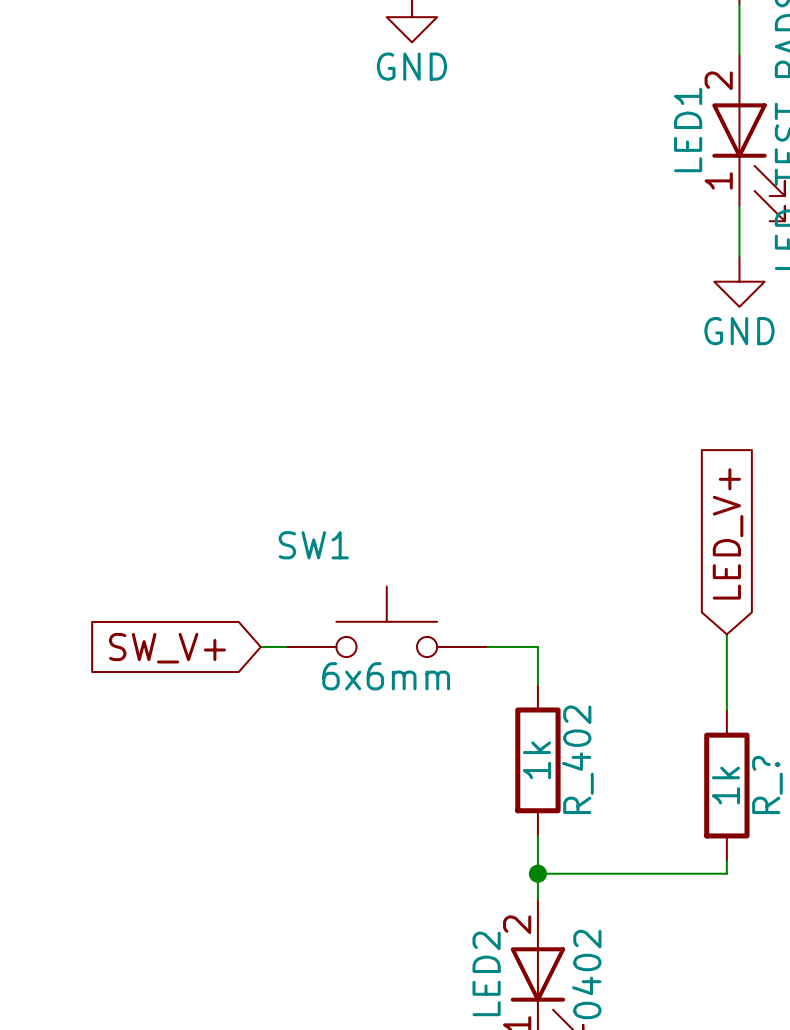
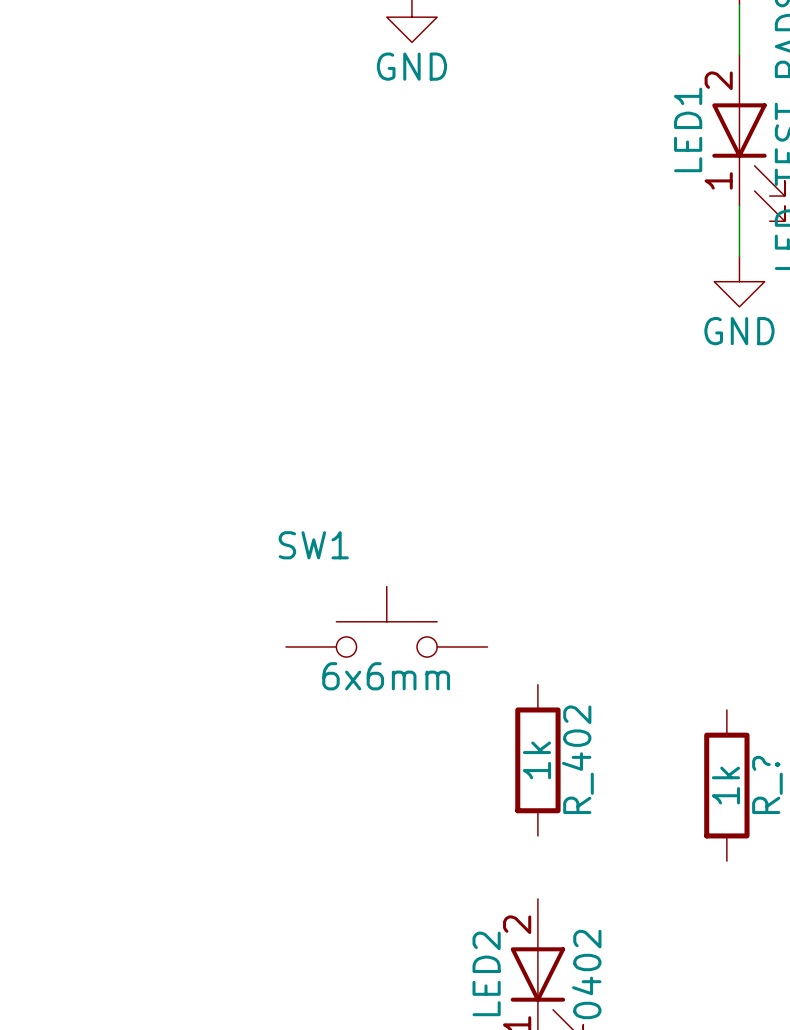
global label: LED_V+ (728, 533) -> none
wire: (726, 634) (726, 709) -> none
wire: (260, 646) (285, 646) -> none
wire: (487, 646) (537, 646) (537, 684) -> none
global label: SW_V+ (167, 648) -> none
wire: (537, 835) (537, 898) -> none
wire: (726, 861) (726, 873) (537, 873) -> none
junction: (537, 873) -> none

